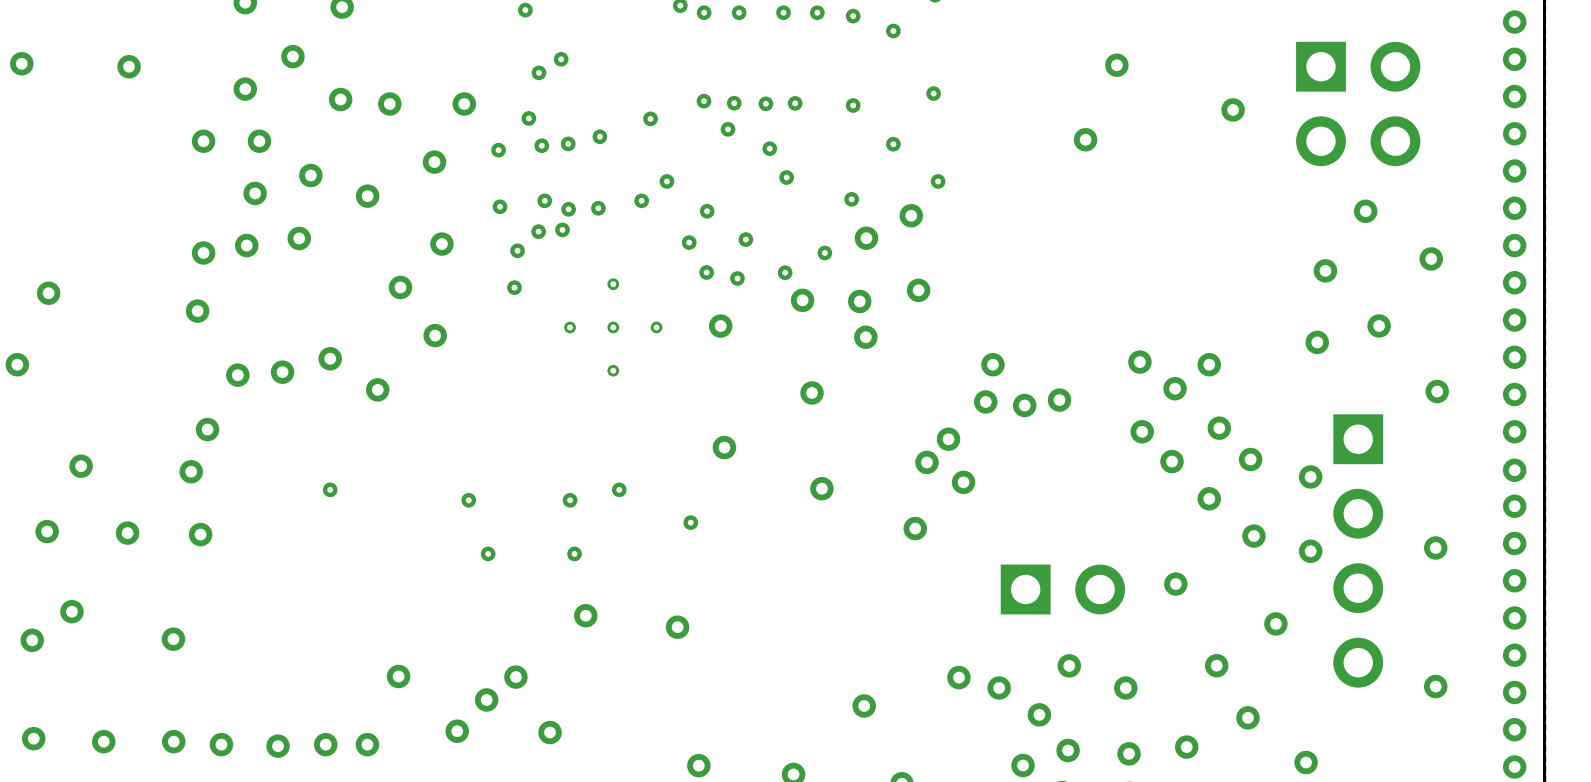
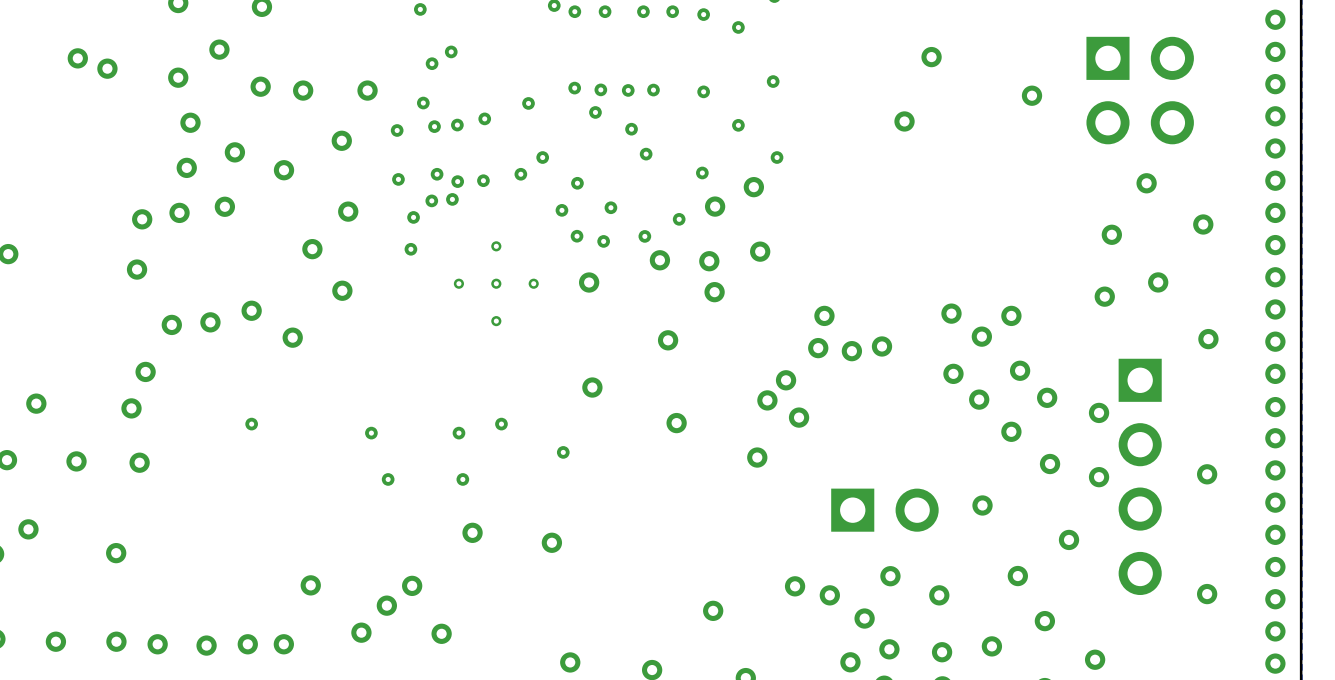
via position: (203, 141) -> (107, 68)

